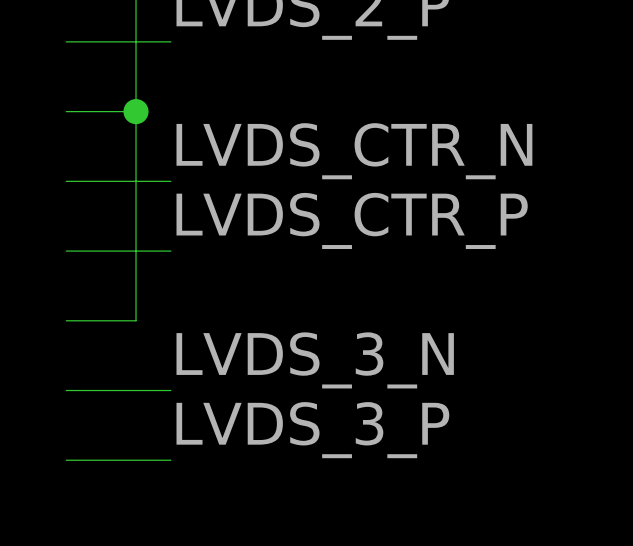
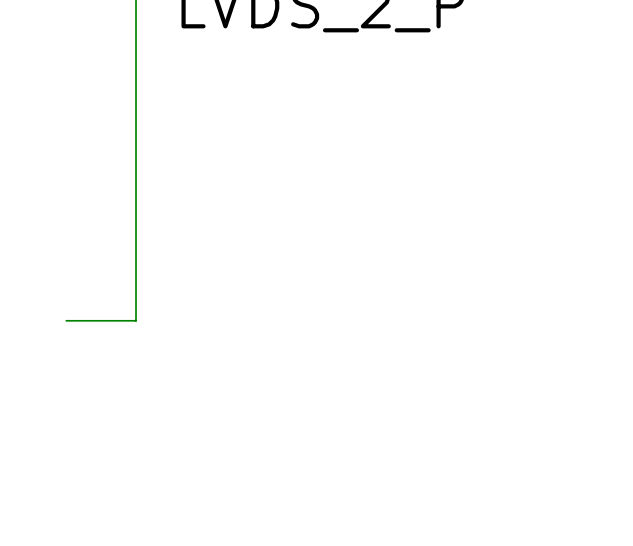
wire: (66, 41) (170, 41) -> none
wire: (66, 111) (136, 111) -> none
junction: (136, 111) -> none
label: LVDS_CTR_N (354, 151) -> none
wire: (66, 181) (170, 181) -> none
label: LVDS_CTR_P (352, 220) -> none
wire: (66, 251) (170, 251) -> none
label: LVDS_3_N (315, 360) -> none
wire: (66, 390) (170, 390) -> none
label: LVDS_3_P (312, 430) -> none
wire: (66, 460) (170, 460) -> none

